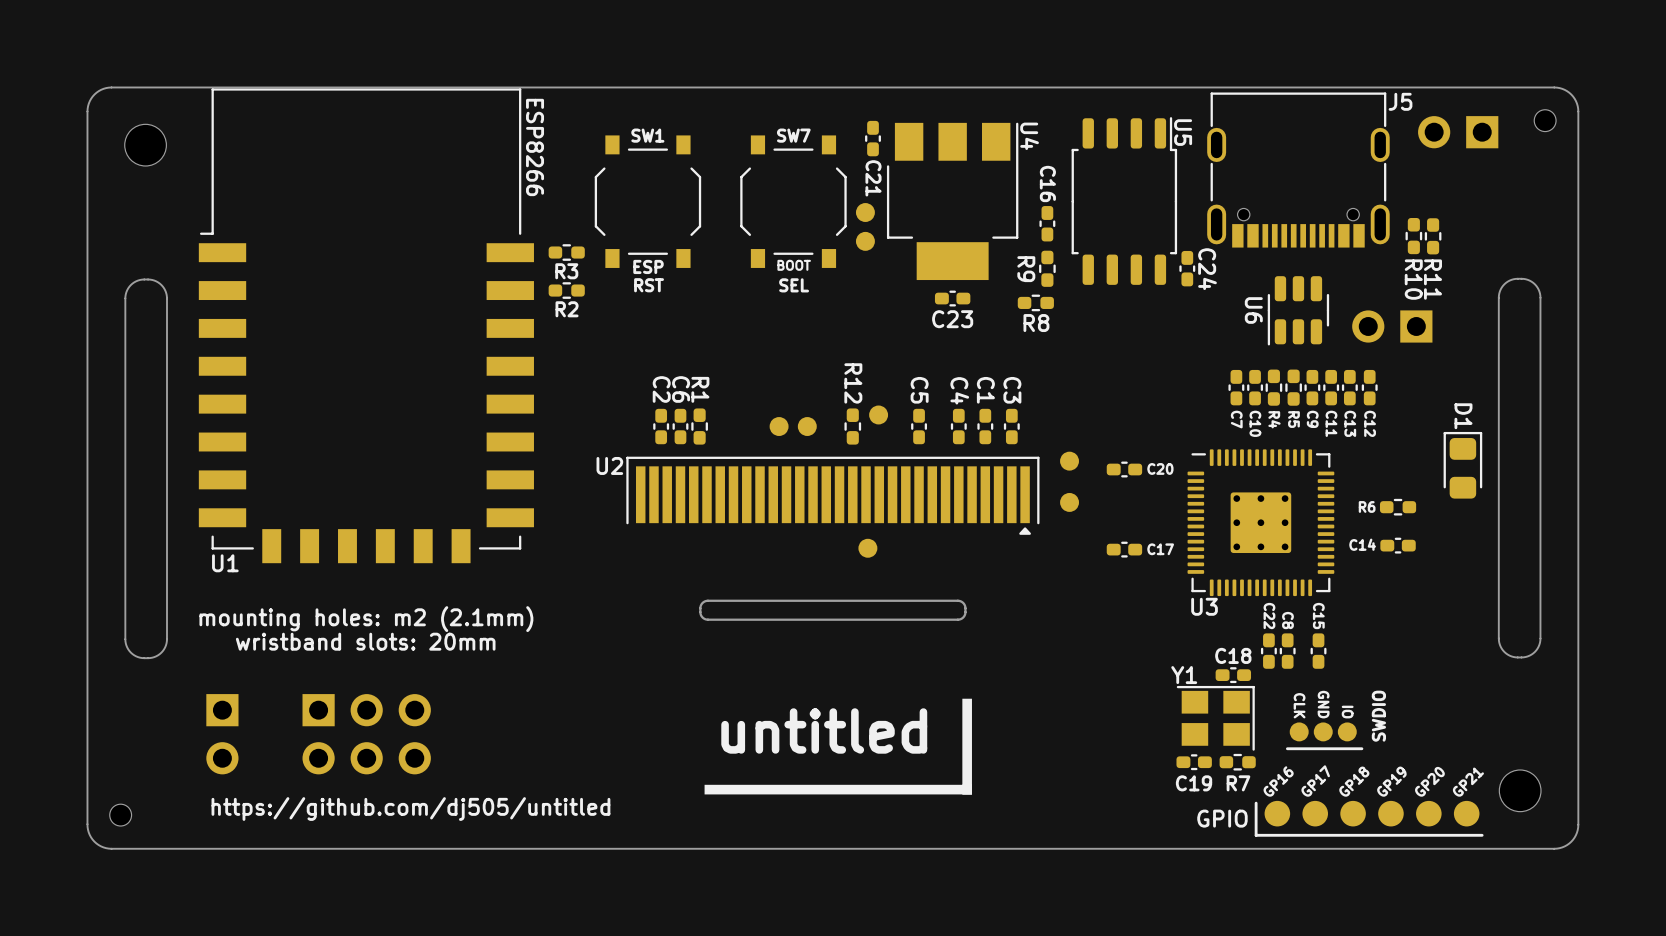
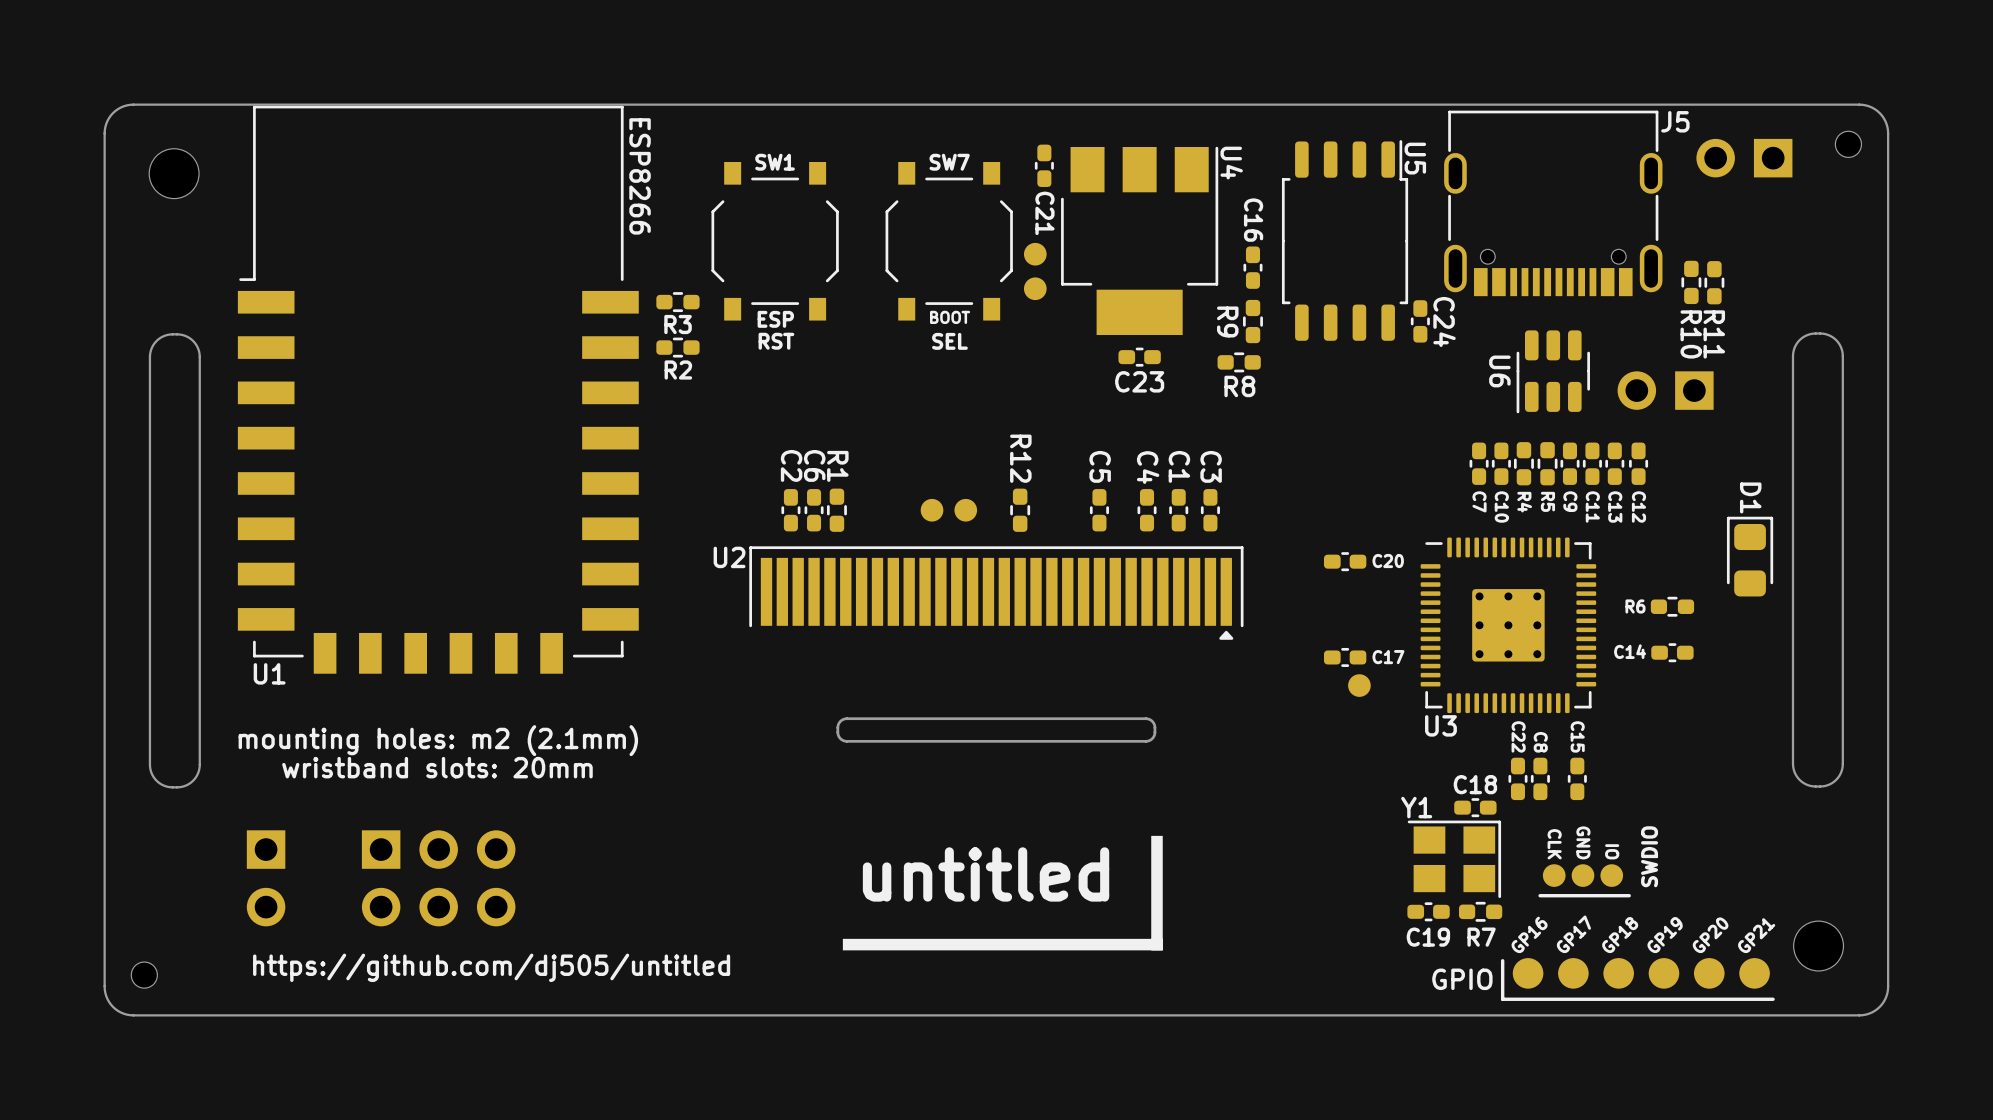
part: (878, 414) -> none
part: (1069, 461) -> none
part: (1069, 502) -> none
part: (867, 548) -> none
part: none -> (1359, 685)

